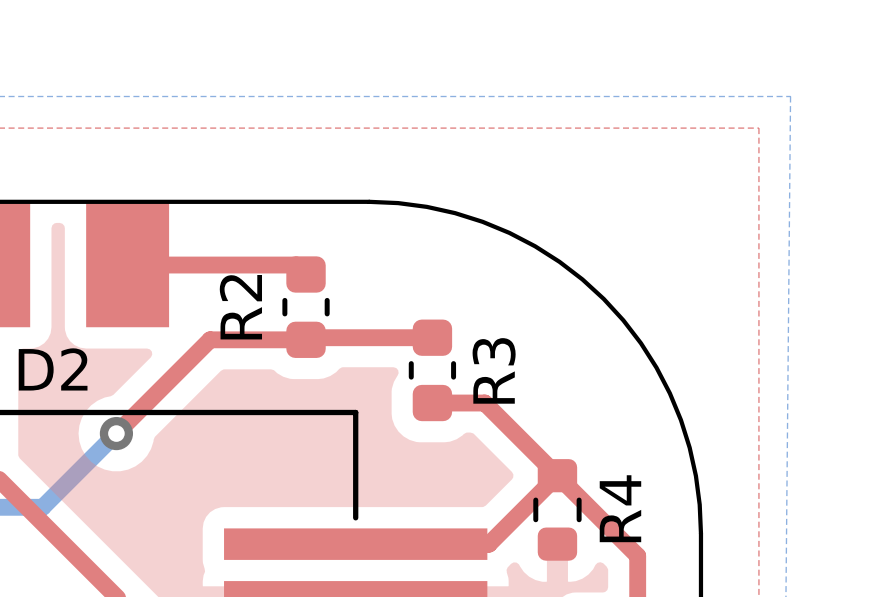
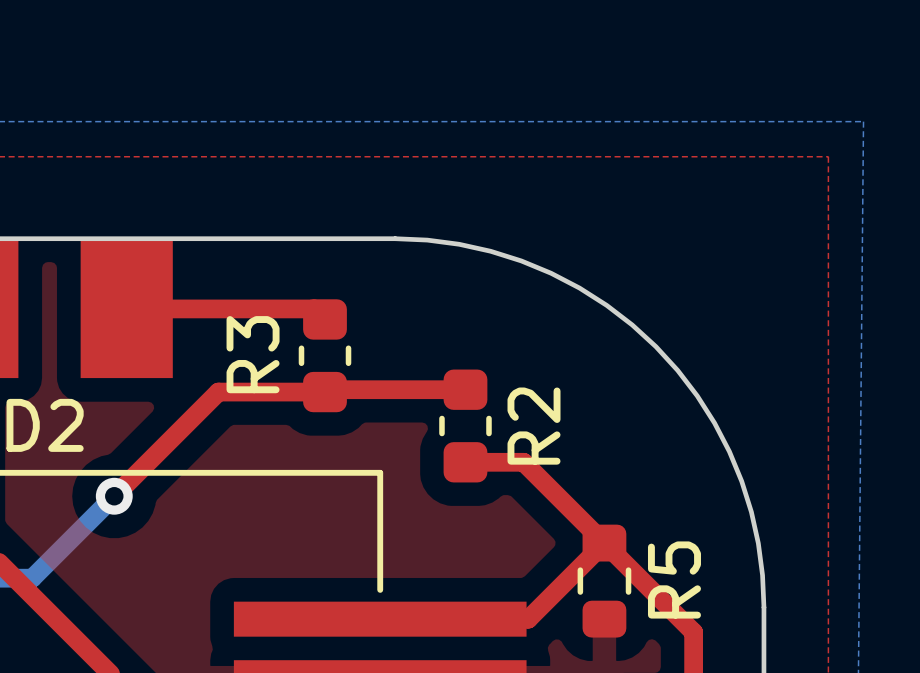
R2 name: R2 (240, 307) -> R3 (253, 354)
R3 name: R3 (494, 370) -> R2 (534, 426)
R4 name: R4 (620, 508) -> R5 (674, 579)

